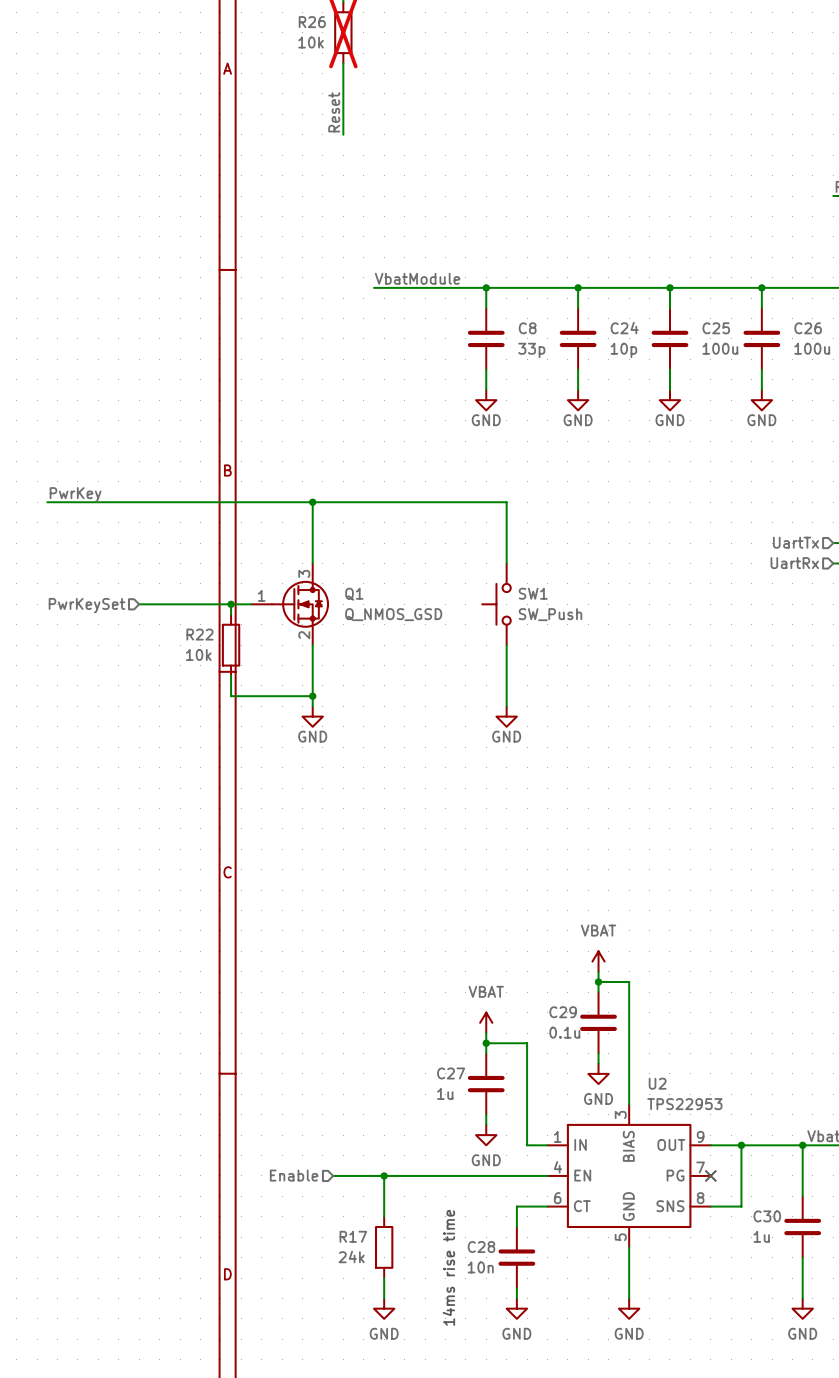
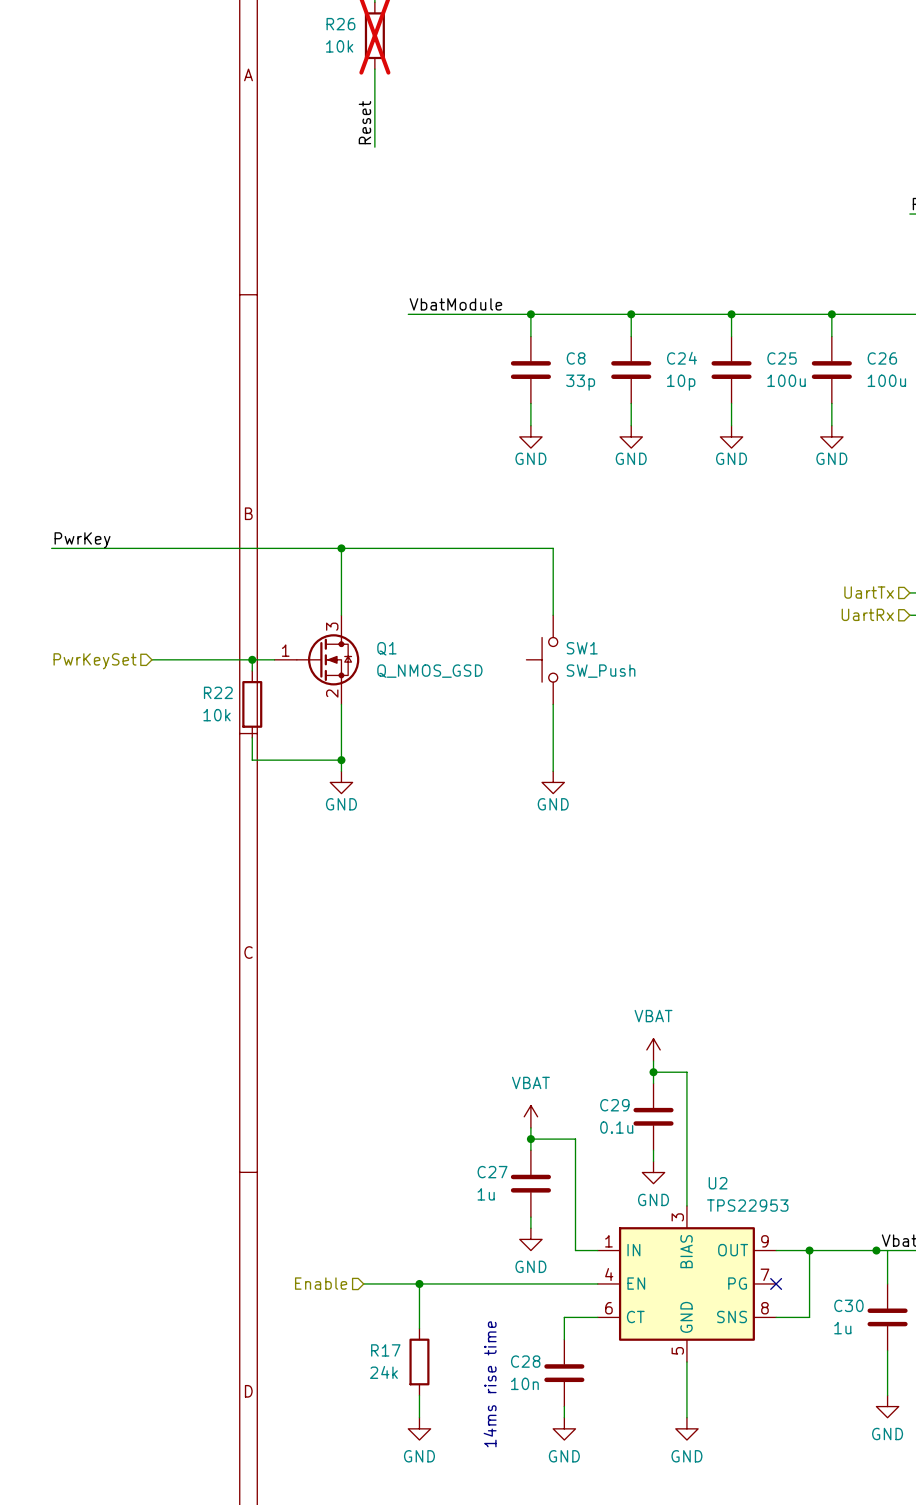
wire: (802, 1145) (802, 1196) -> none
wire: none -> (887, 1250) (887, 1283)
C30 position: (802, 1226) -> (887, 1317)
wire: (802, 1257) (802, 1298) -> (887, 1350) (887, 1395)
power symbol position: GND (802, 1308) -> GND (887, 1406)

